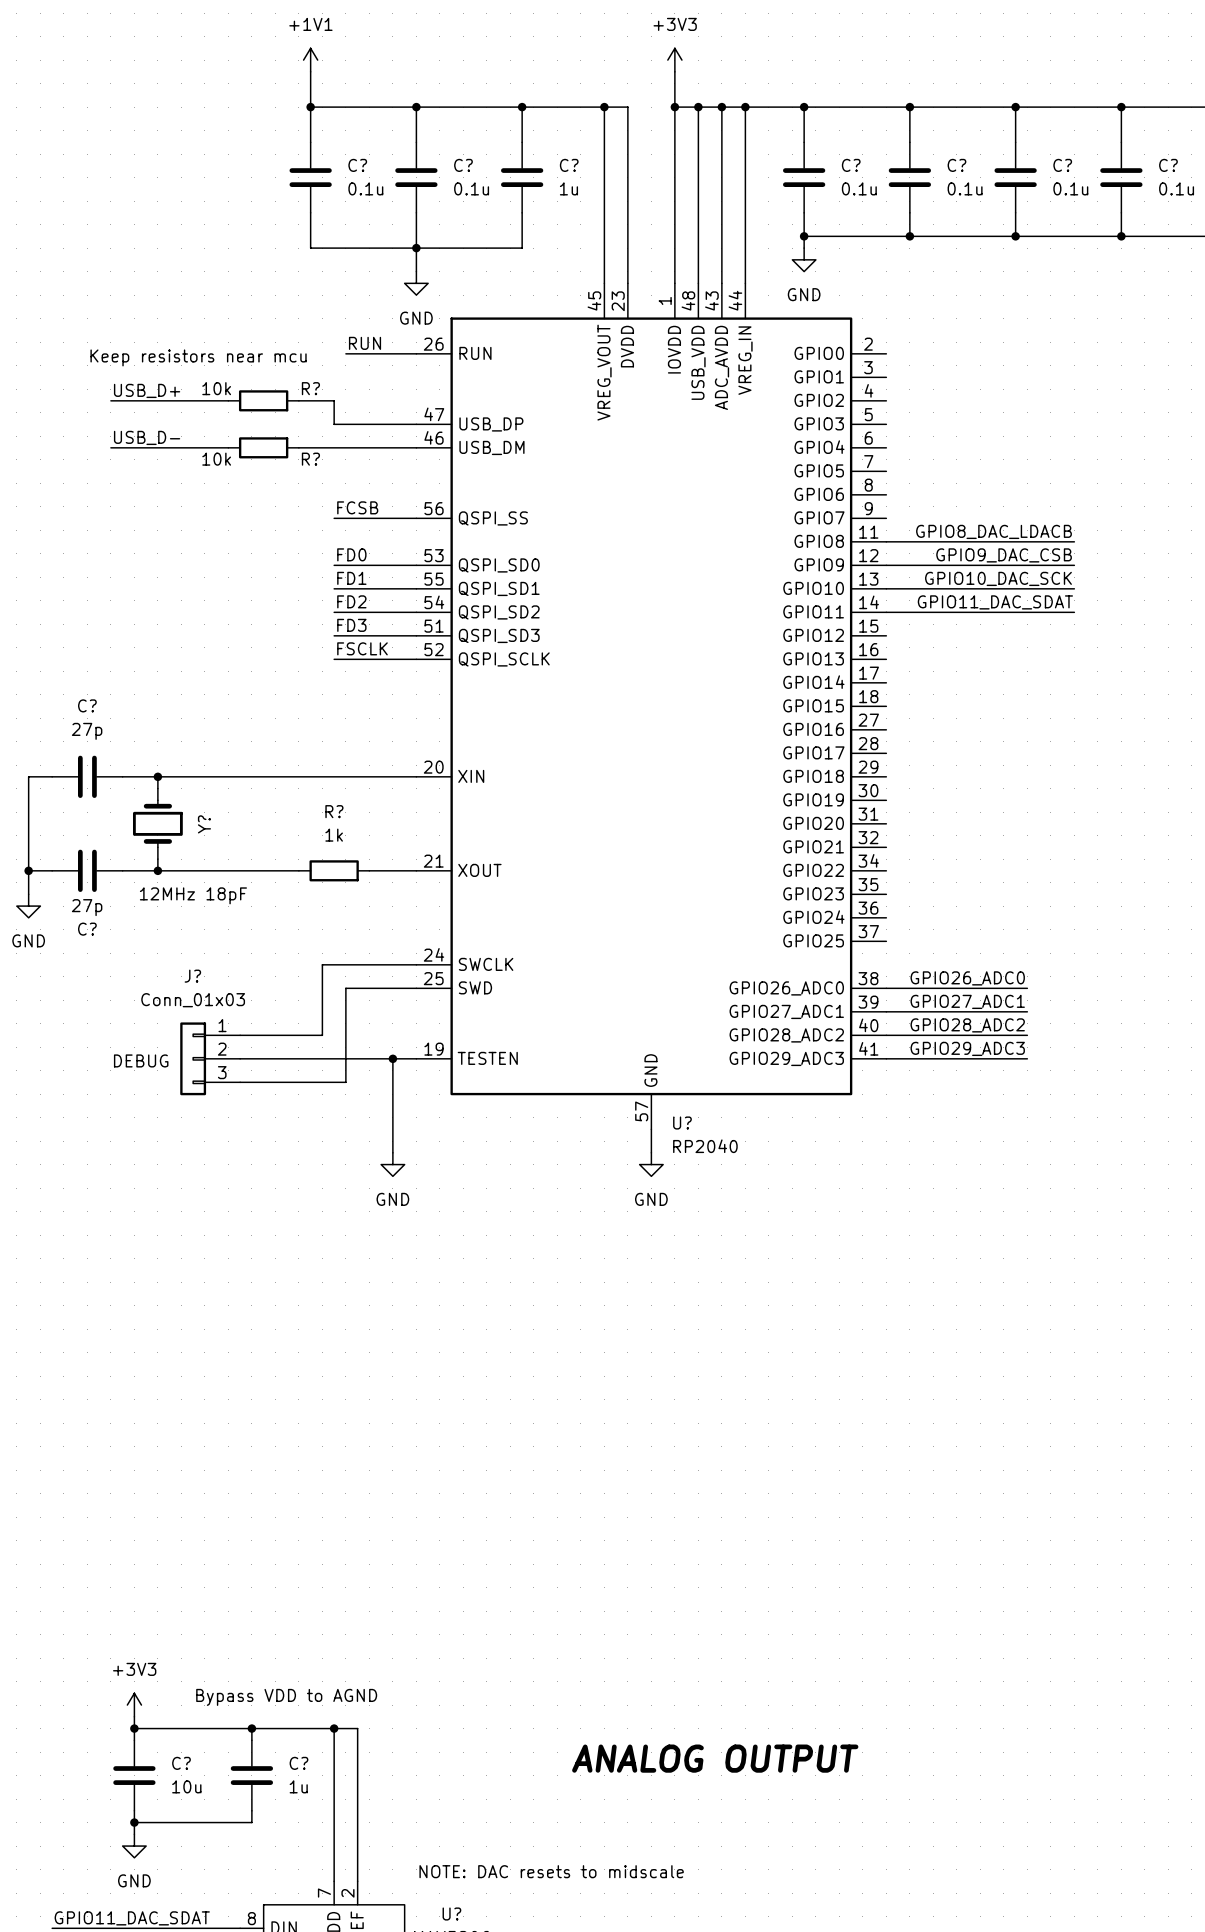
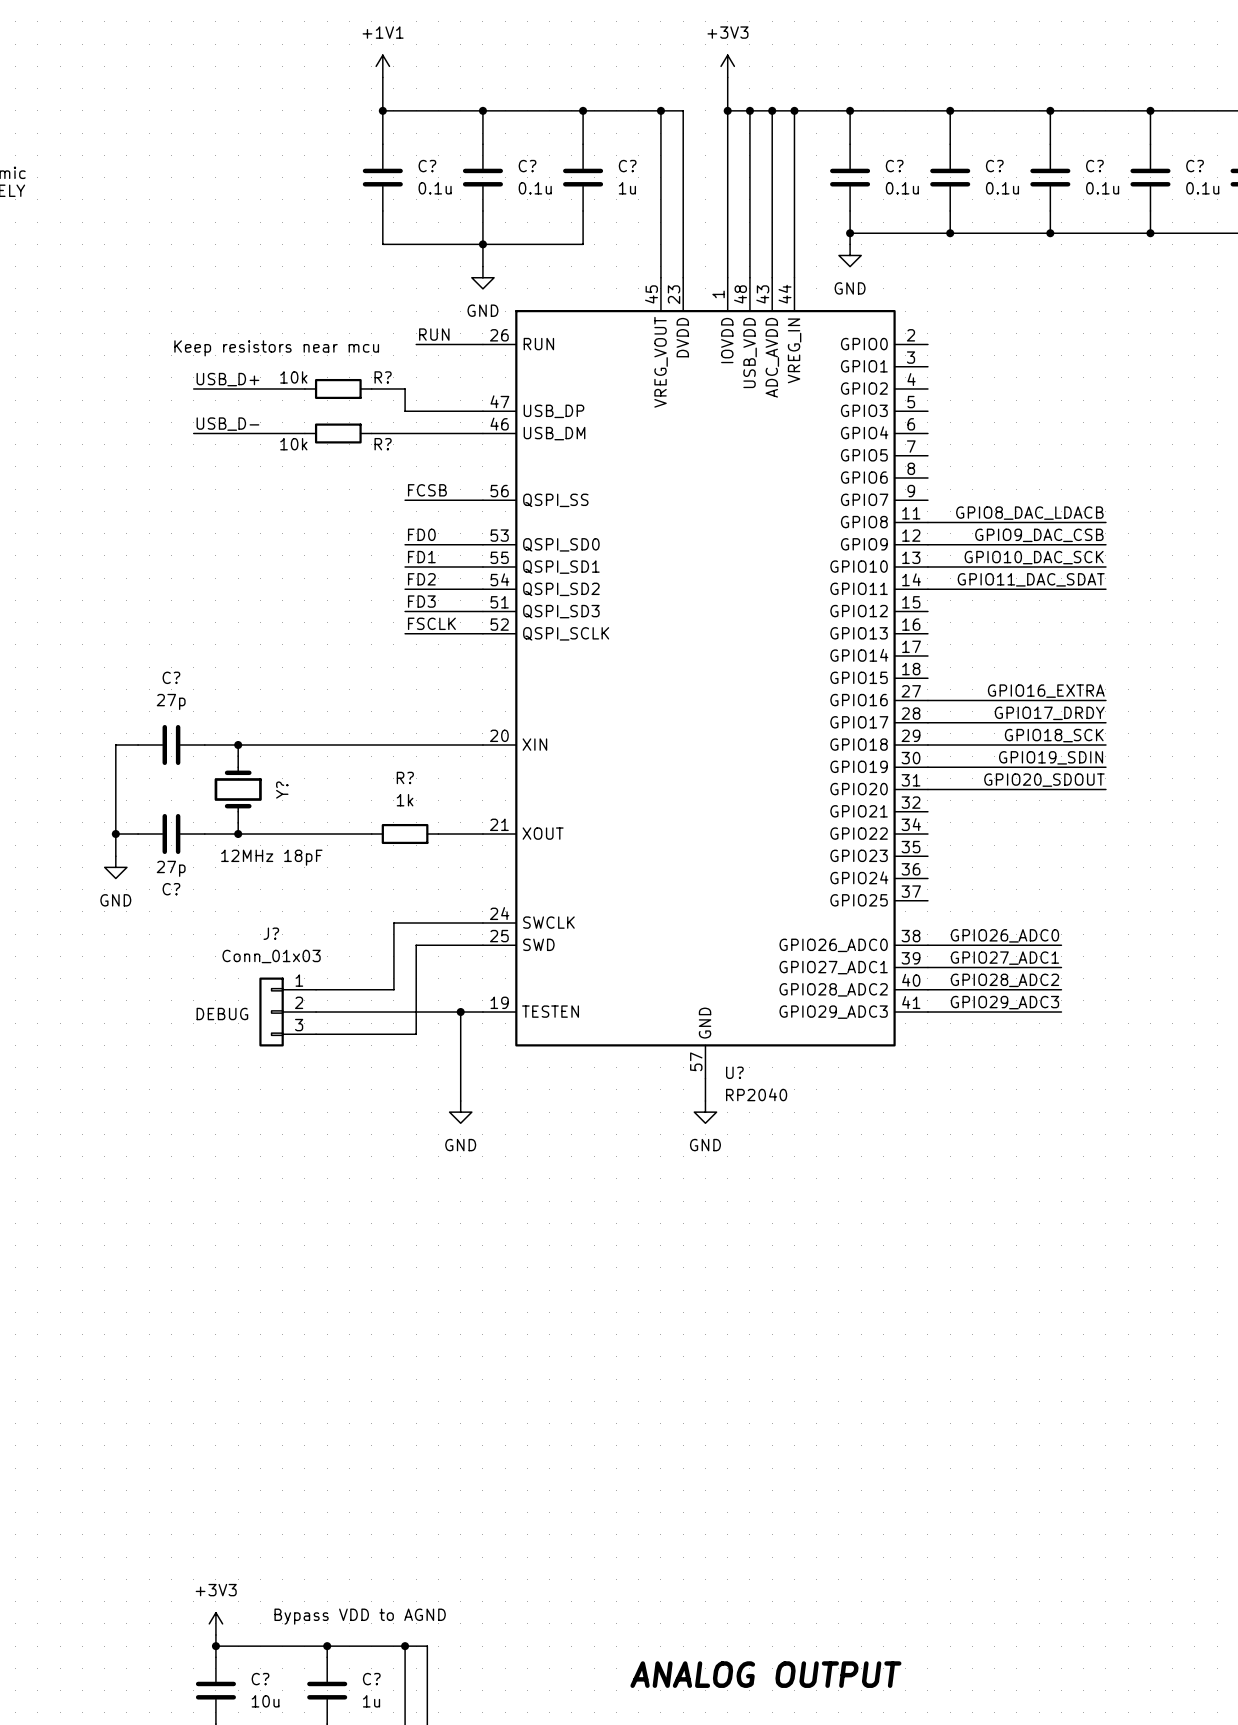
label: none -> GPIO16_EXTRA (1046, 691)
wire: none -> (927, 700) (1105, 700)
label: none -> GPIO17_DRDY (1049, 713)
wire: none -> (927, 722) (1105, 722)
label: none -> GPIO18_SCK (1054, 735)
wire: none -> (927, 744) (1105, 744)
label: none -> GPIO19_SDIN (1051, 757)
wire: none -> (927, 767) (1105, 767)
label: none -> GPIO20_SDOUT (1044, 780)
wire: none -> (927, 789) (1105, 789)

